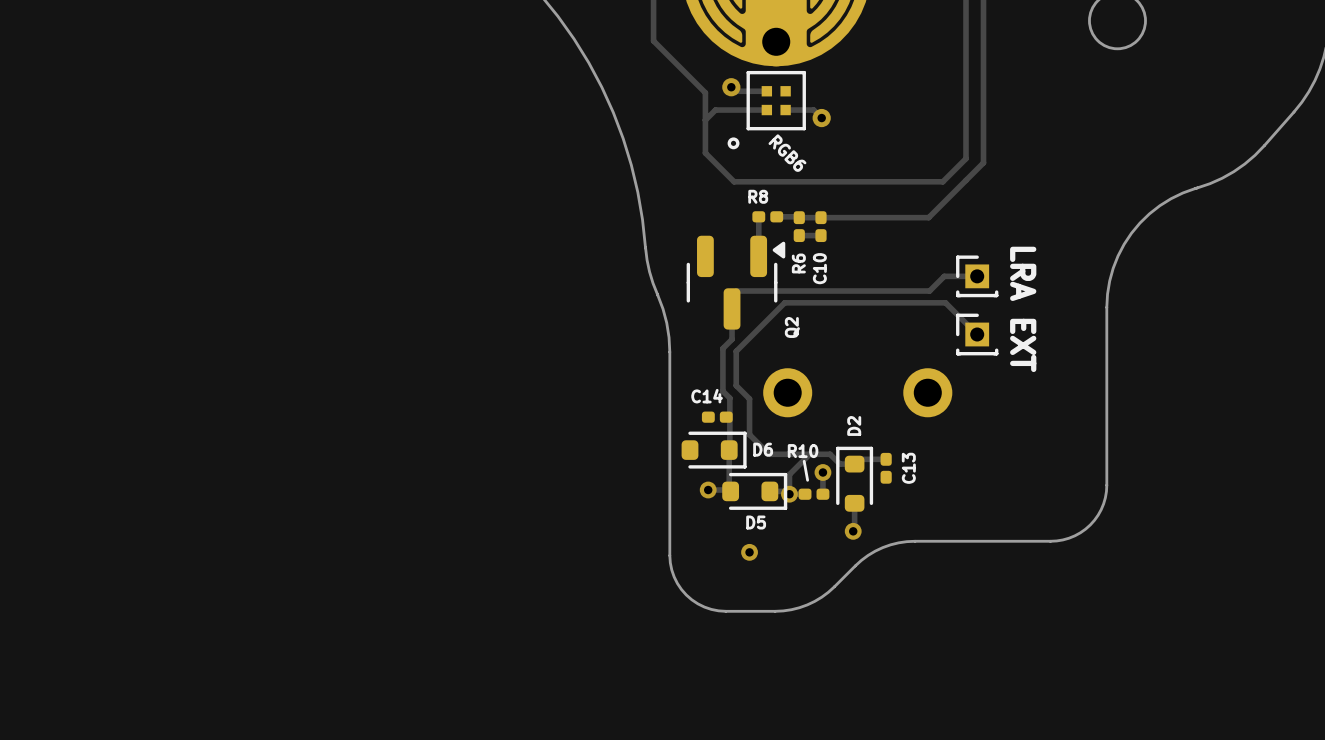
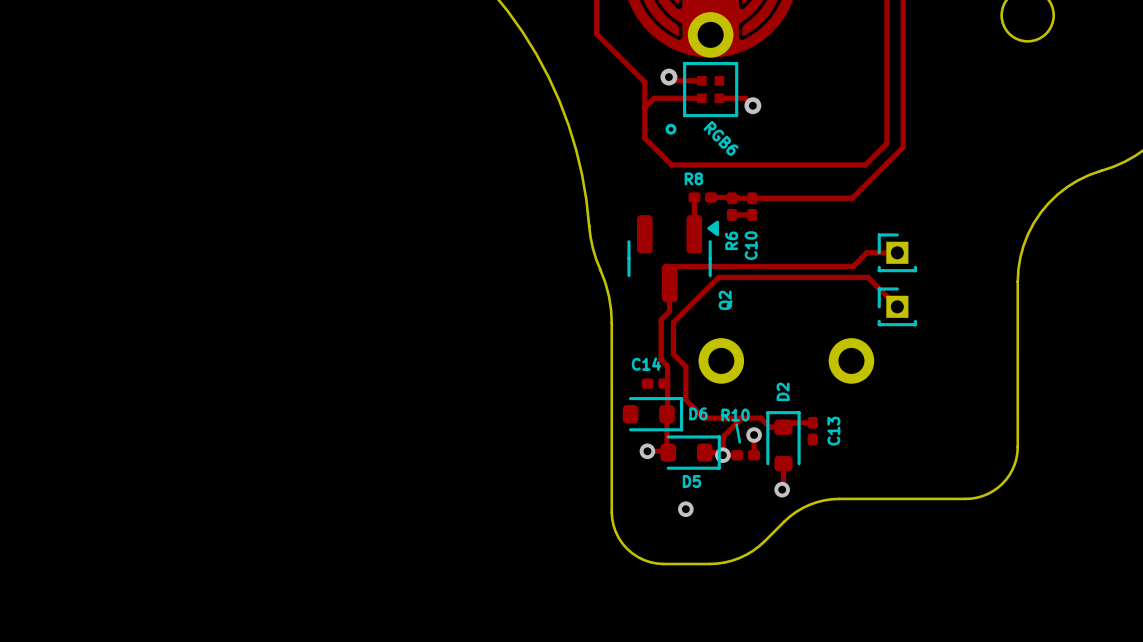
text: LRA EXT (1023, 309) -> none

